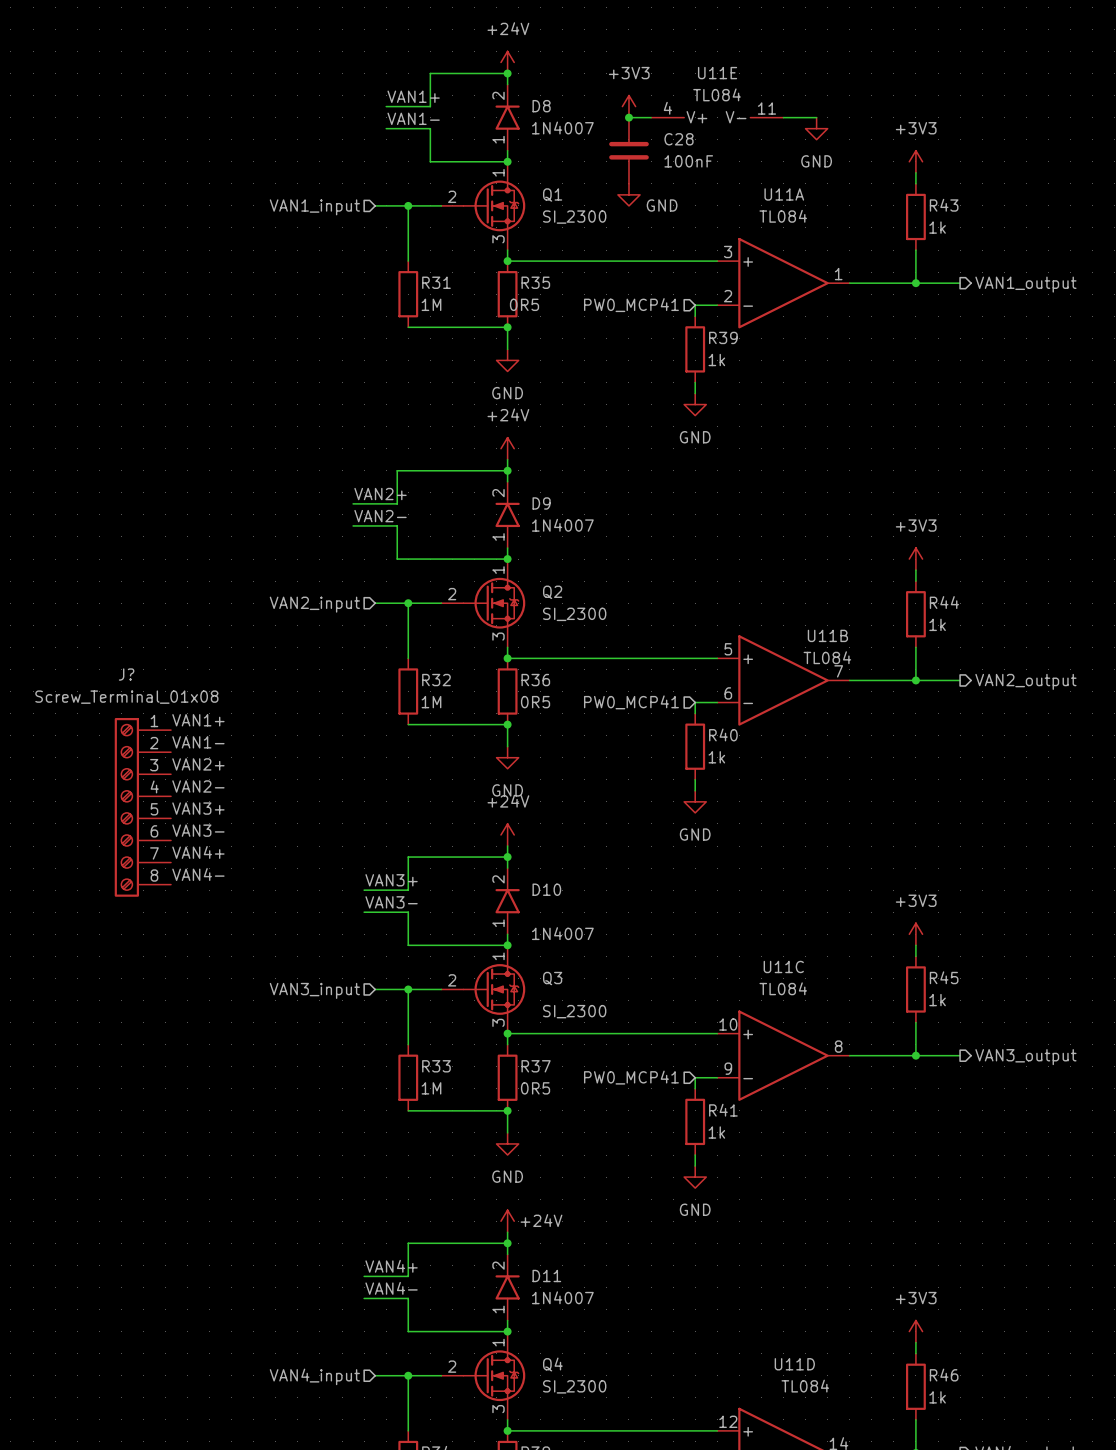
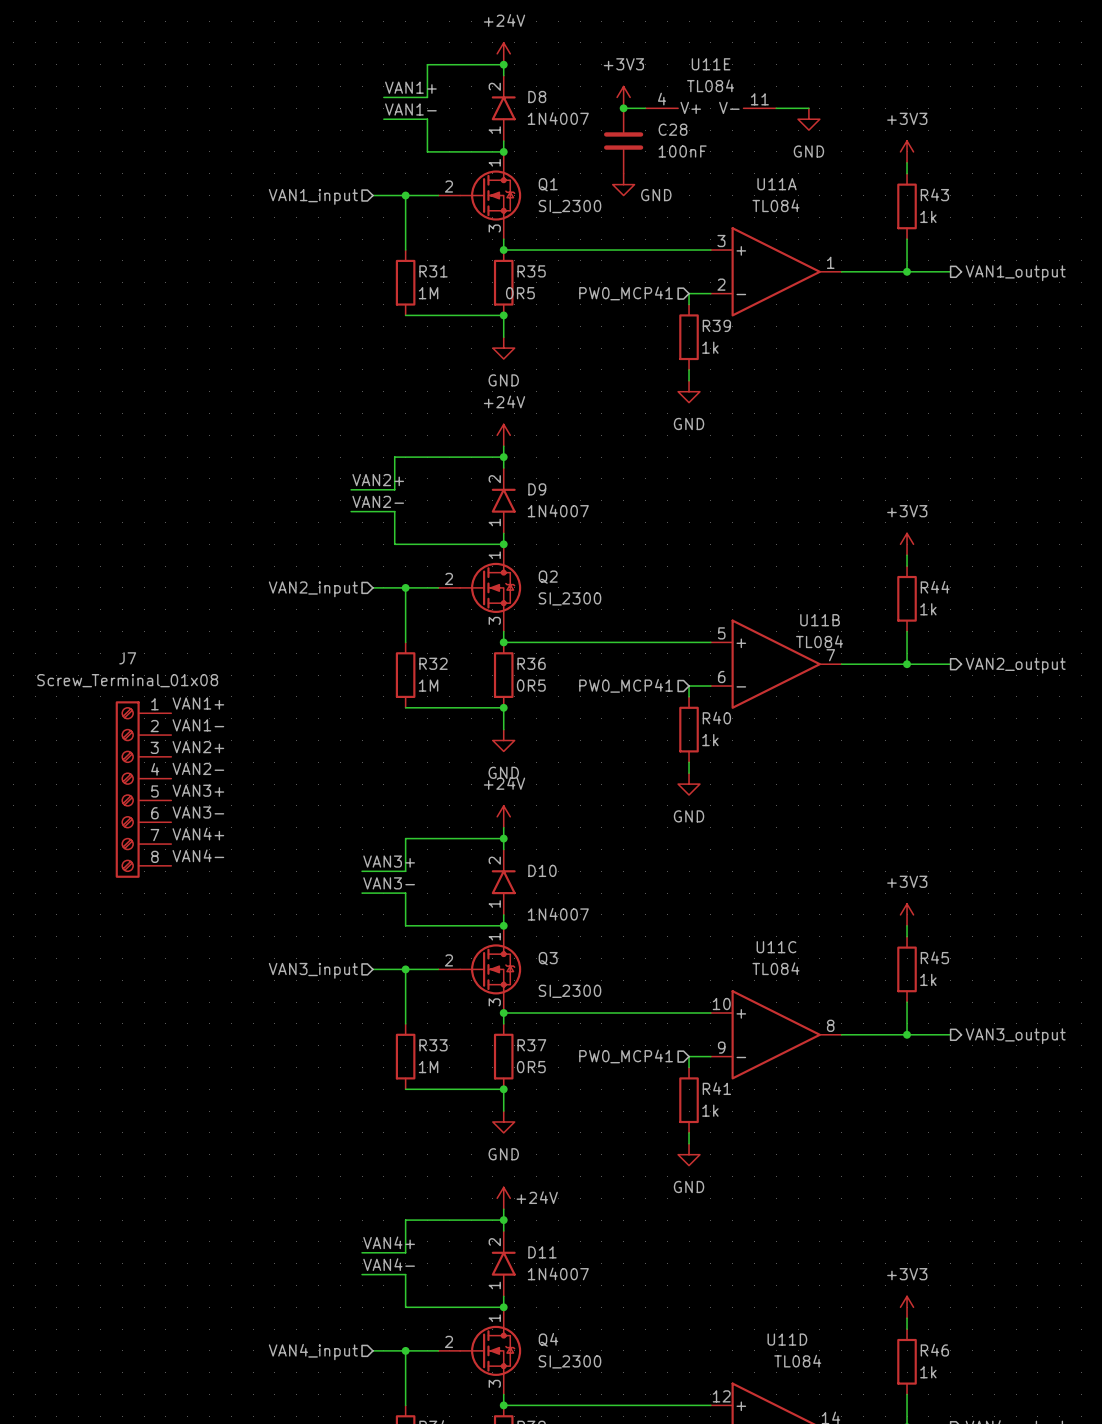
J? name: J? (126, 674) -> J7 (127, 658)

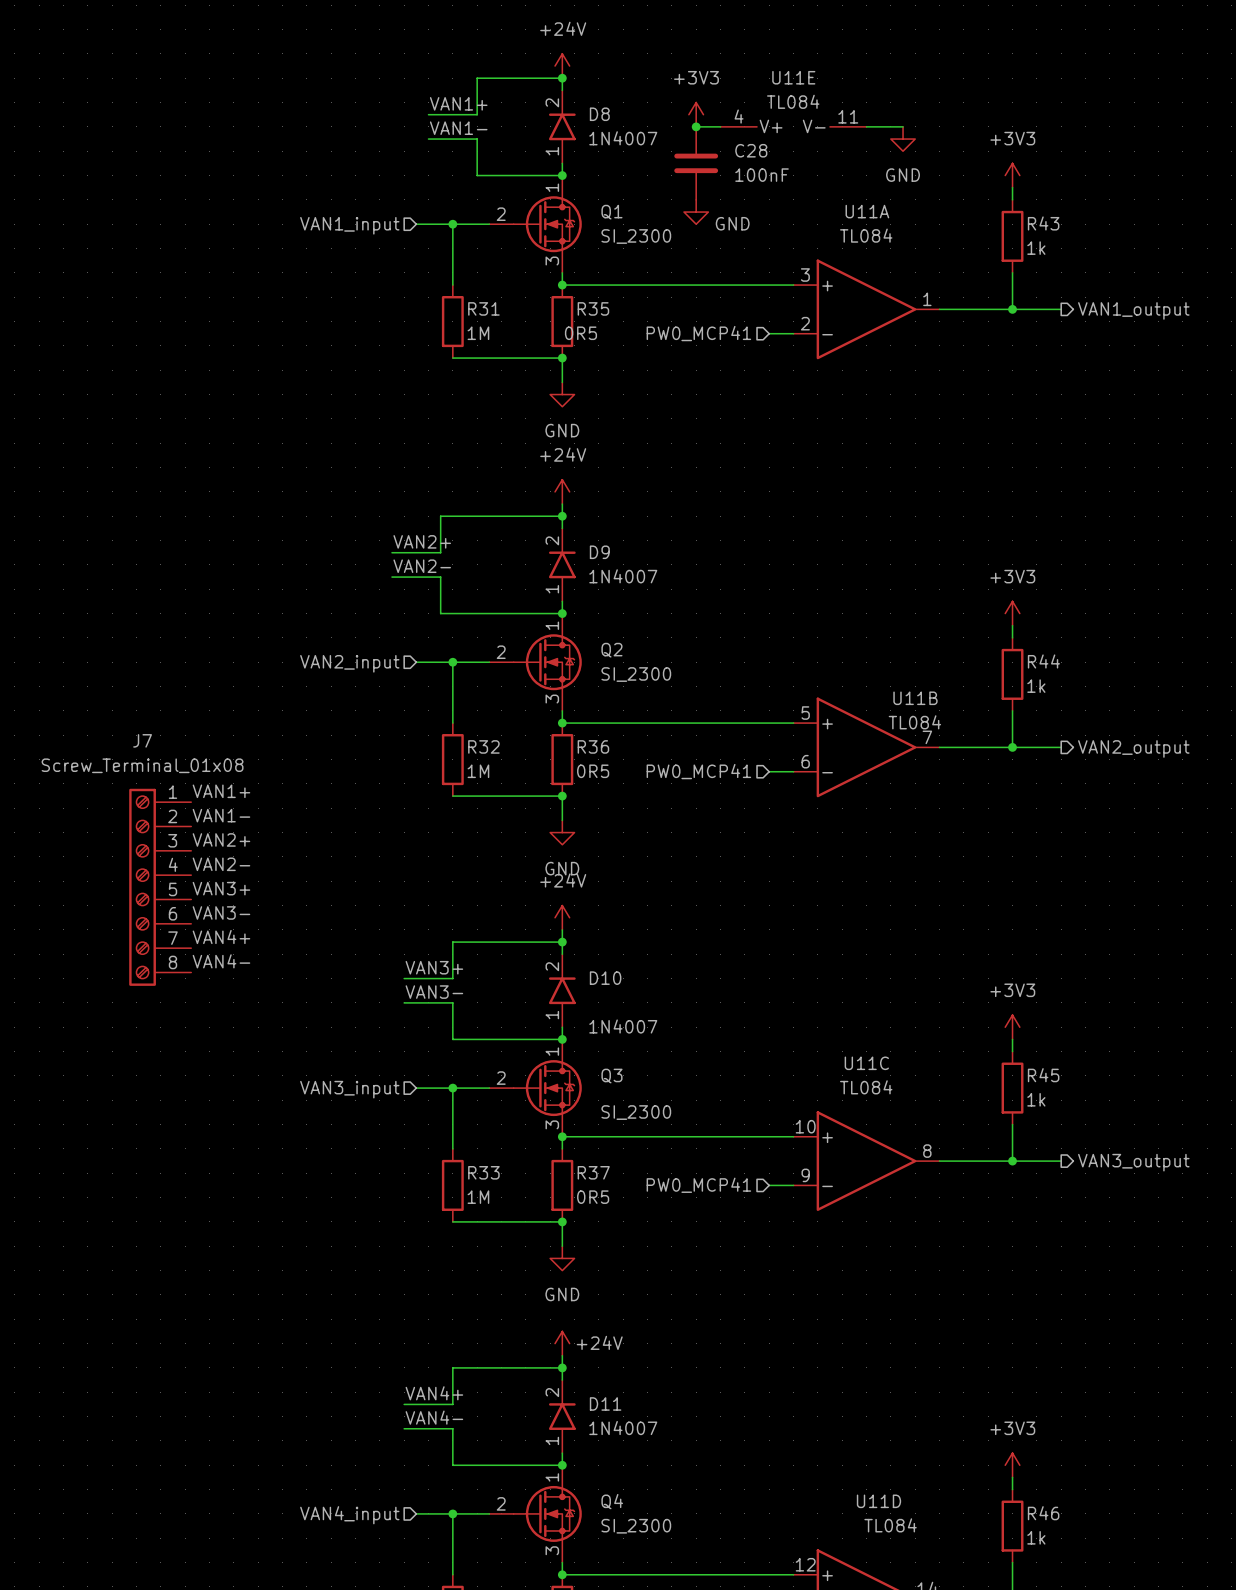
wire: (689, 293) (689, 304) -> none
R39: 1k (689, 337) -> none
wire: (689, 369) (689, 380) -> none
power symbol: GND (689, 391) -> none
wire: (689, 686) (689, 696) -> none
R40: 1k (689, 729) -> none
wire: (689, 762) (689, 773) -> none
power symbol: GND (689, 784) -> none
wire: (689, 1056) (689, 1067) -> none
R41: 1k (689, 1100) -> none
wire: (689, 1132) (689, 1143) -> none
power symbol: GND (689, 1154) -> none

